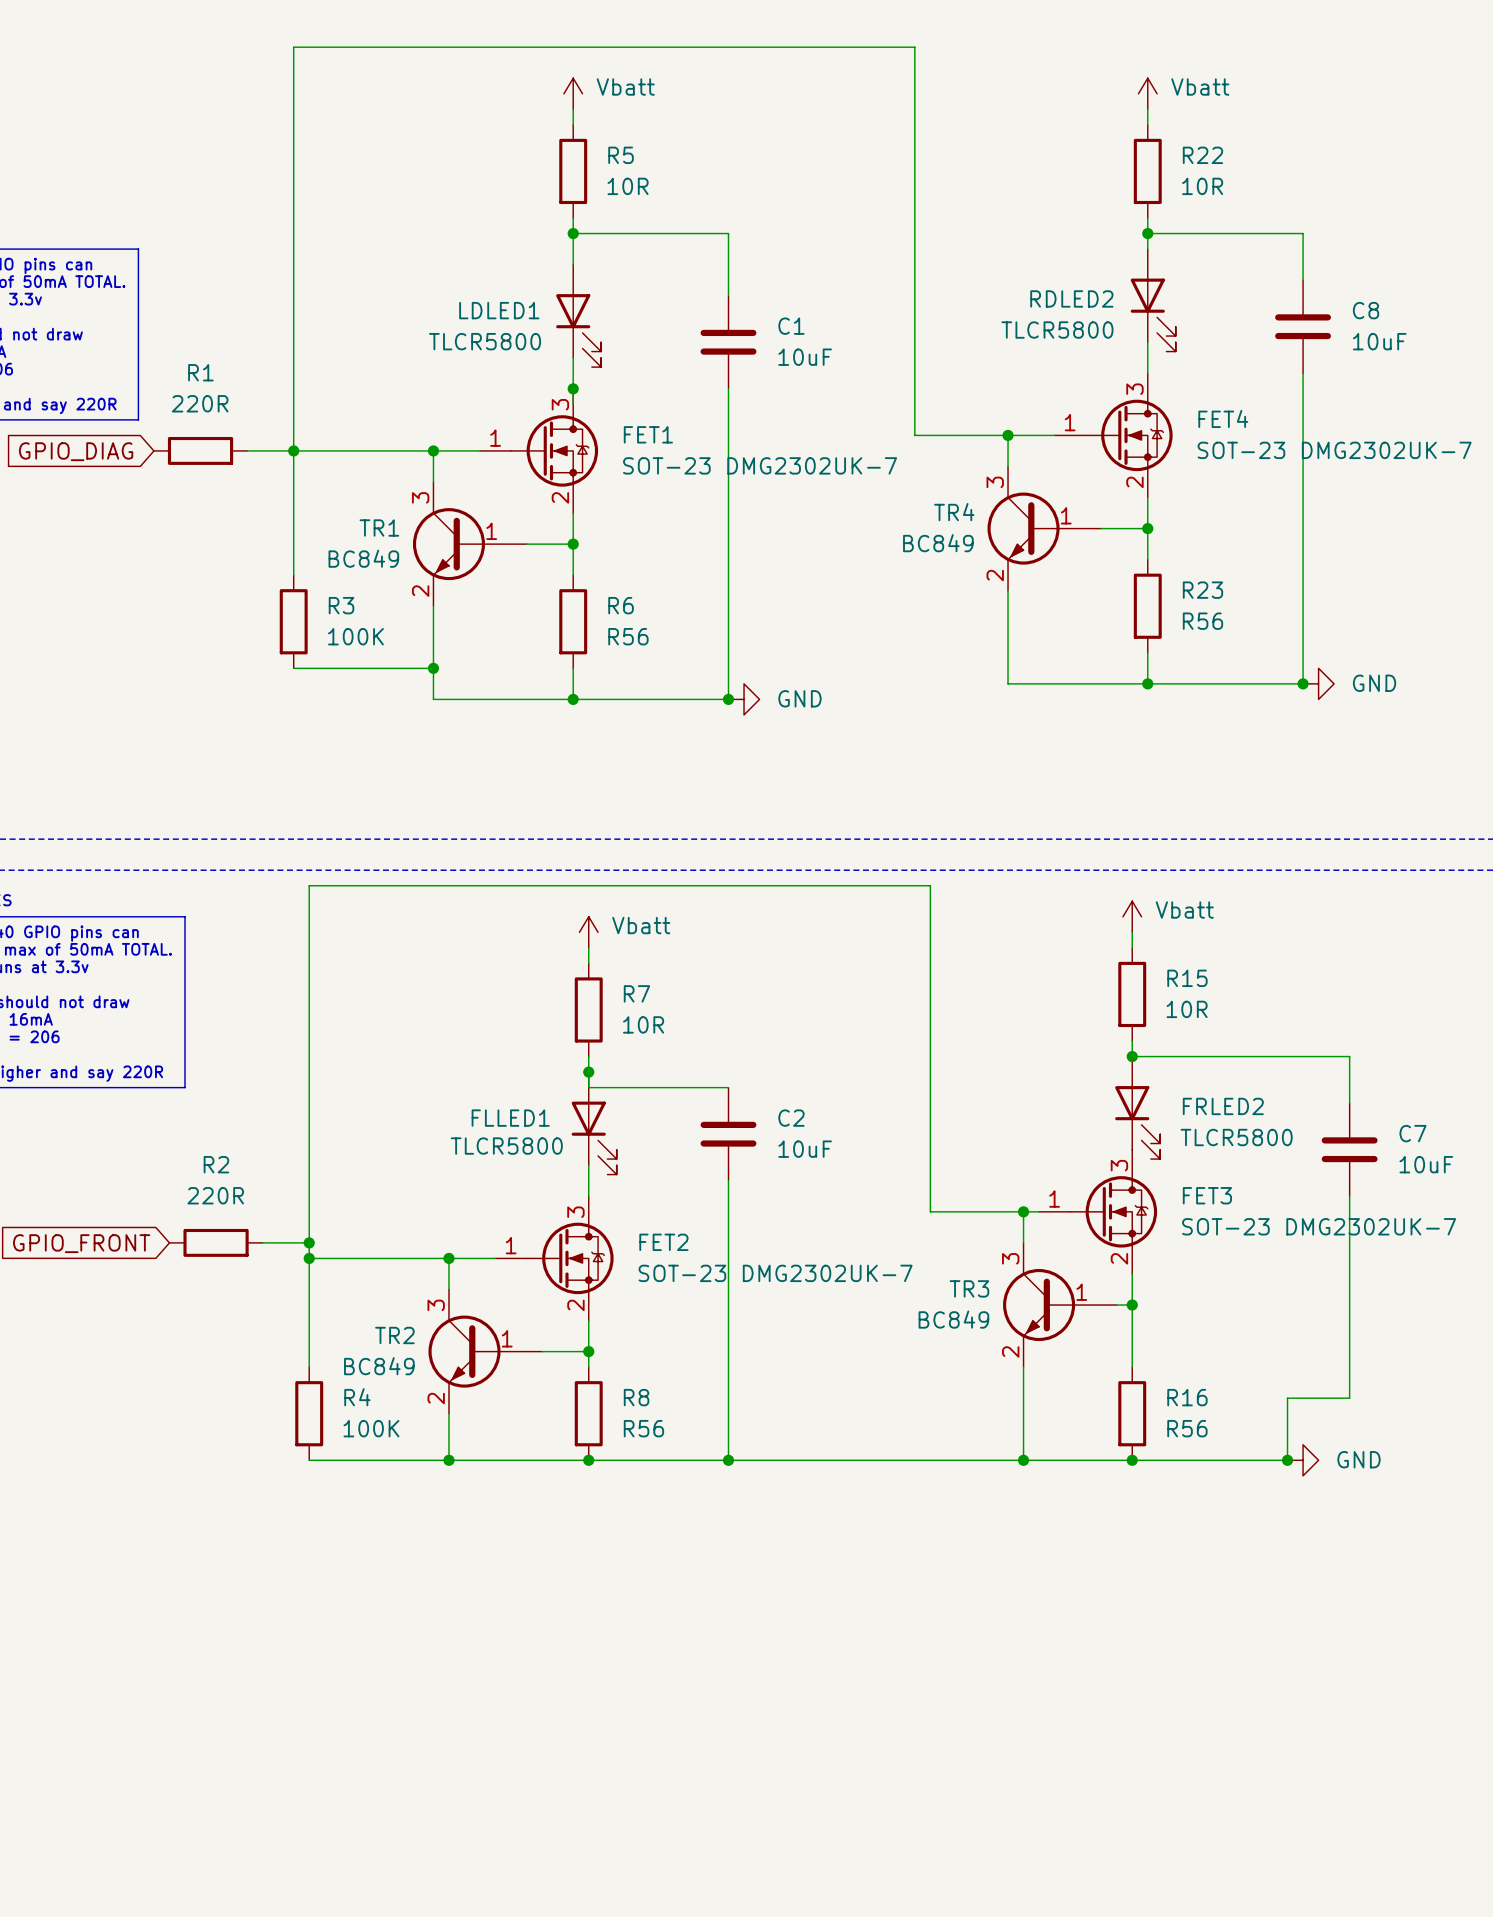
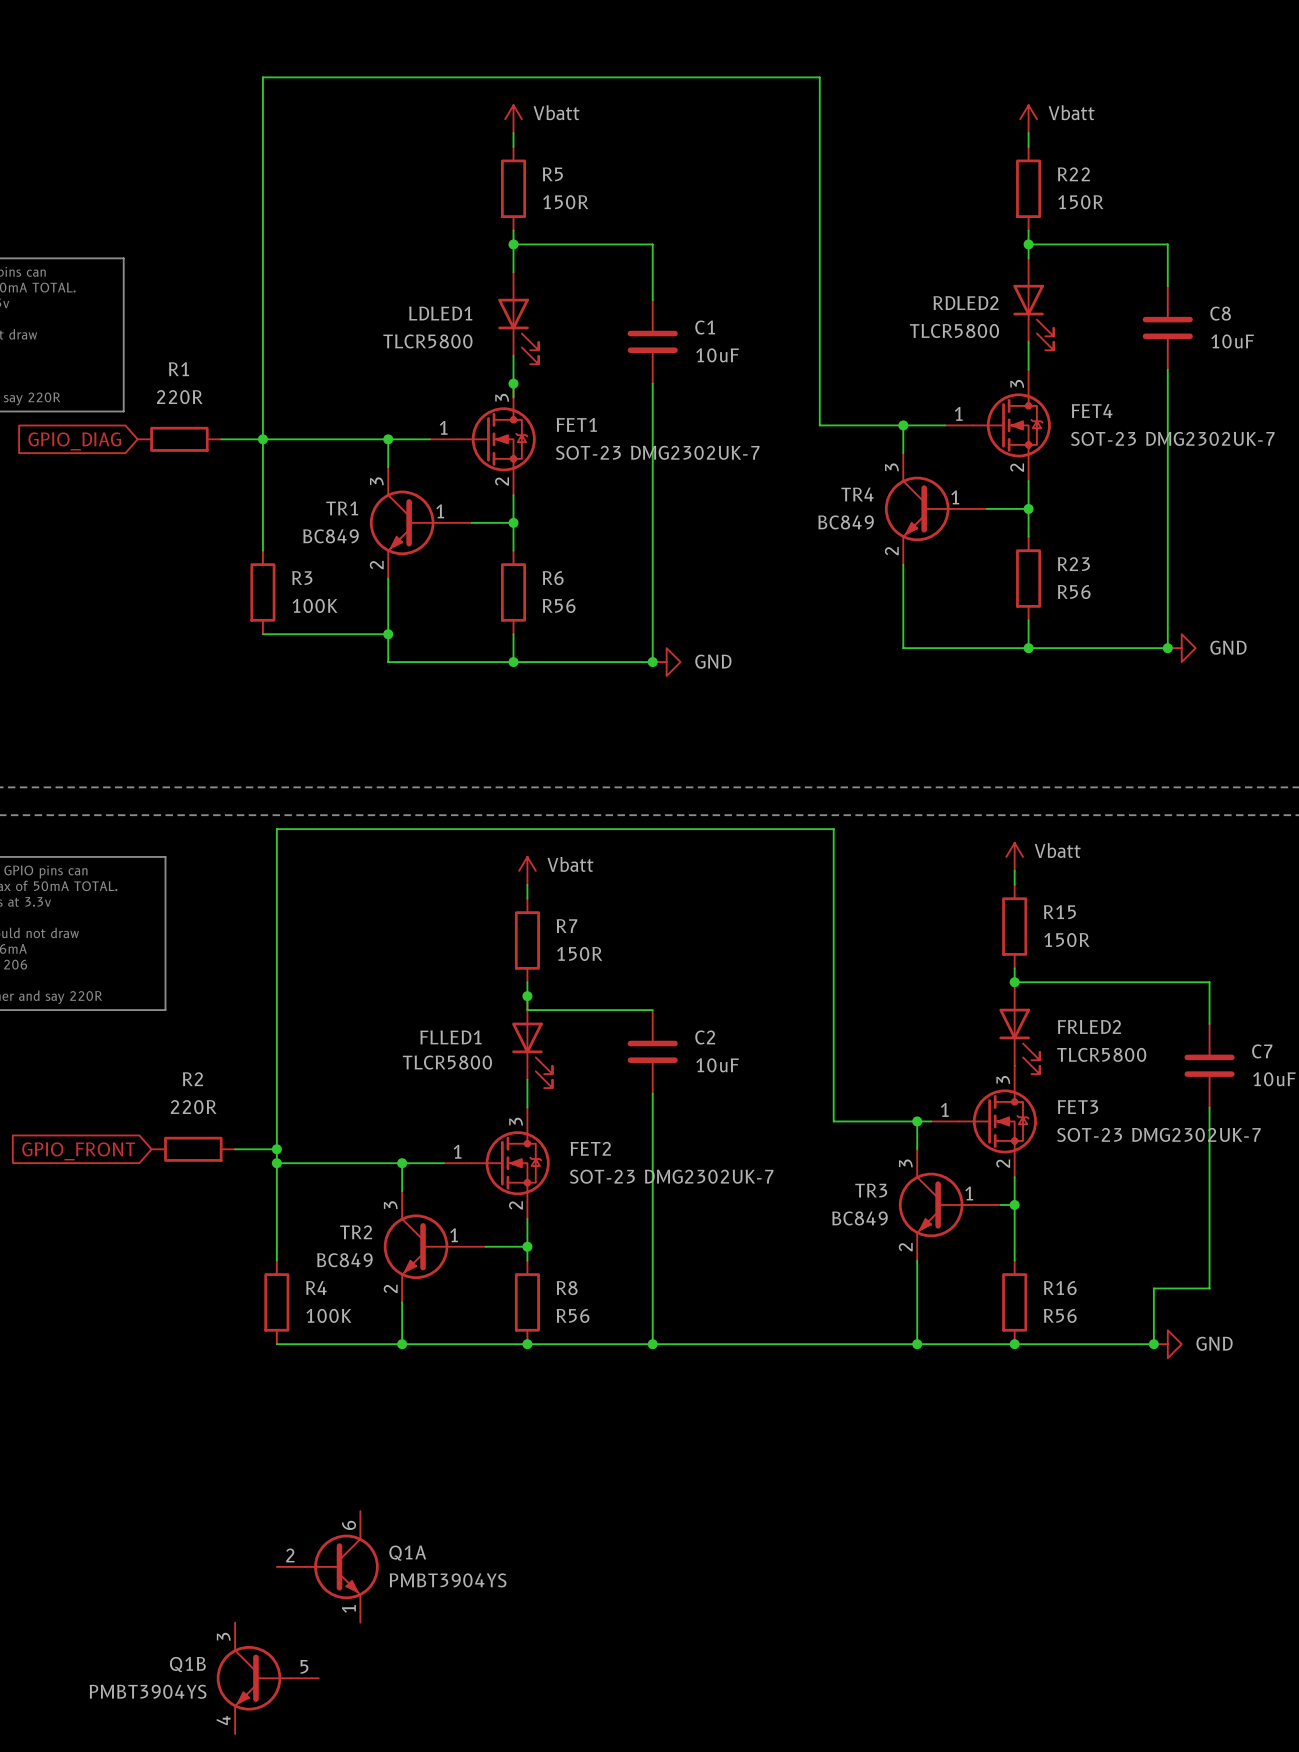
R5 value: 10R (628, 186) -> 150R (565, 202)
R22 value: 10R (1202, 186) -> 150R (1080, 202)
R15 value: 10R (1187, 1009) -> 150R (1066, 940)
R7 value: 10R (643, 1024) -> 150R (579, 953)
Q1A: none -> PMBT3904YS (327, 1566)
Q1B: none -> PMBT3904YS (267, 1678)

